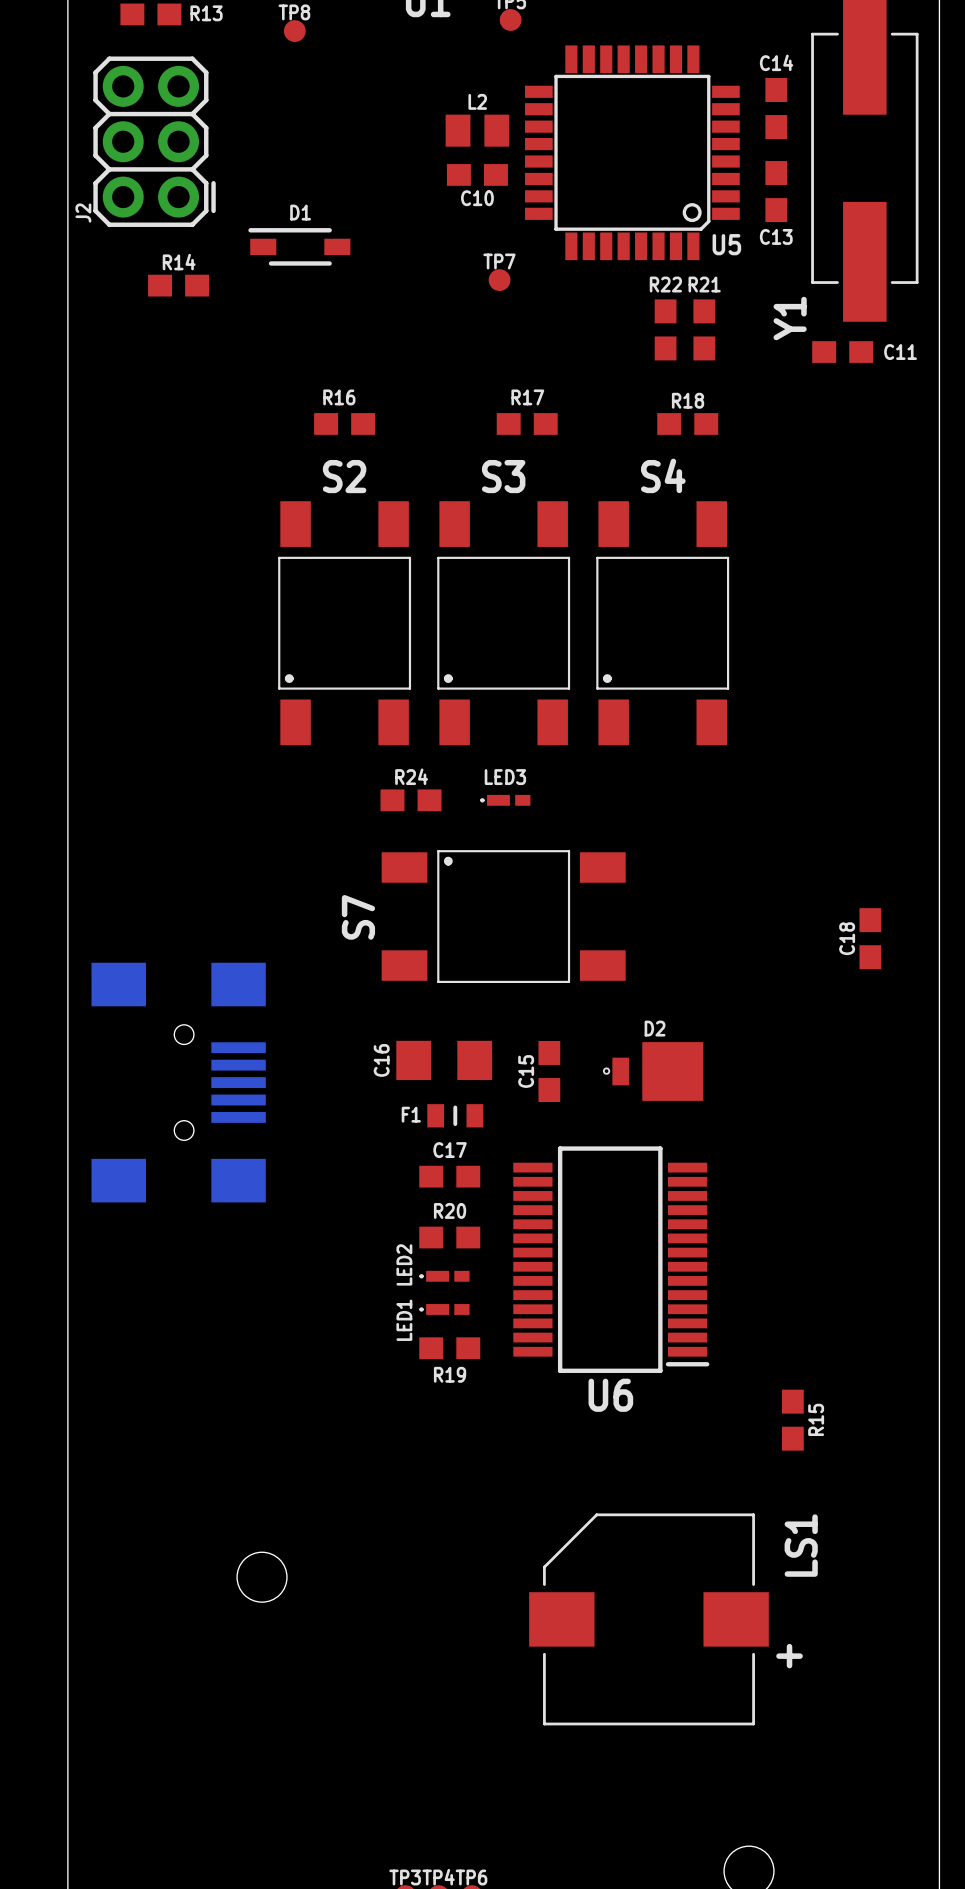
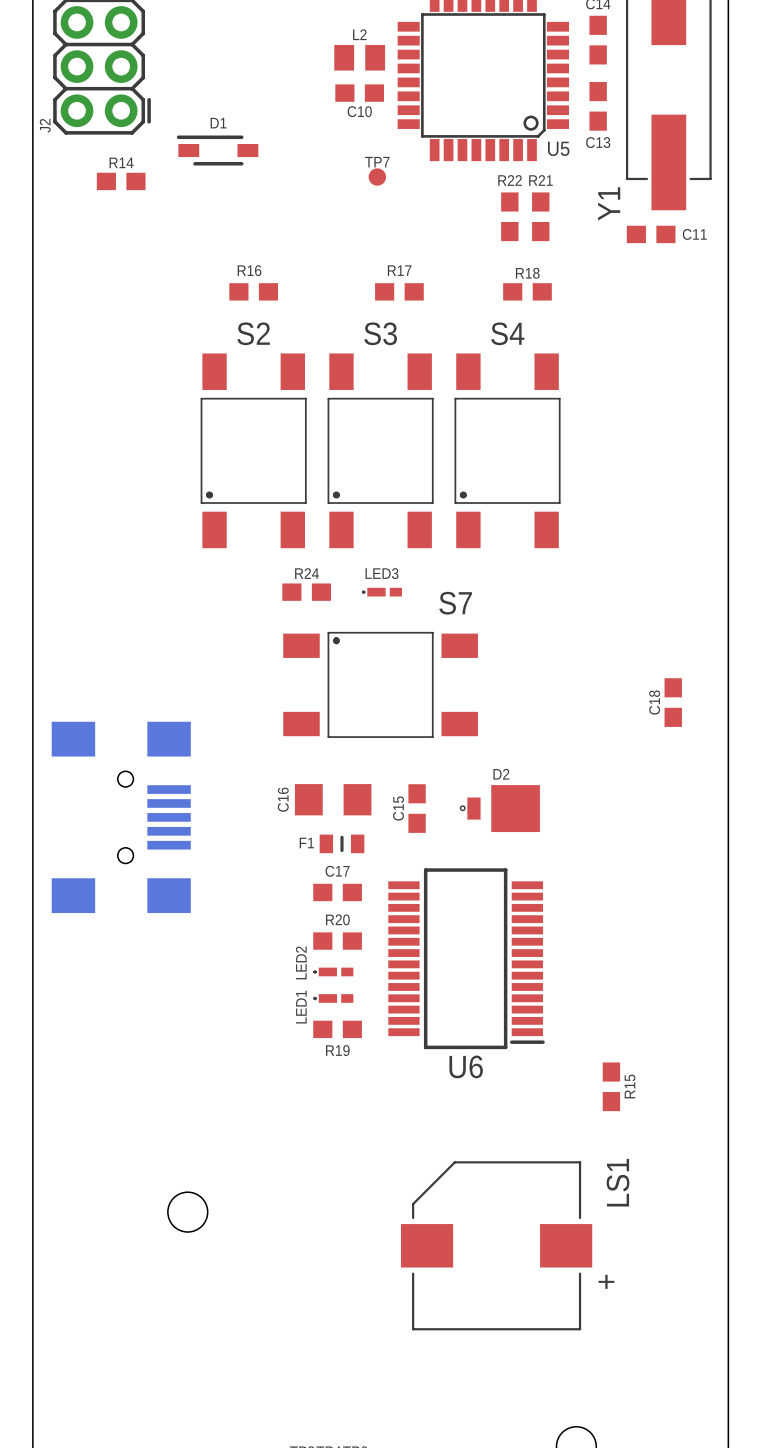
S7 name rotation: 0° (358, 917) -> 90° clockwise (455, 603)
S7 name position: S7 (358, 917) -> S7 (455, 603)

